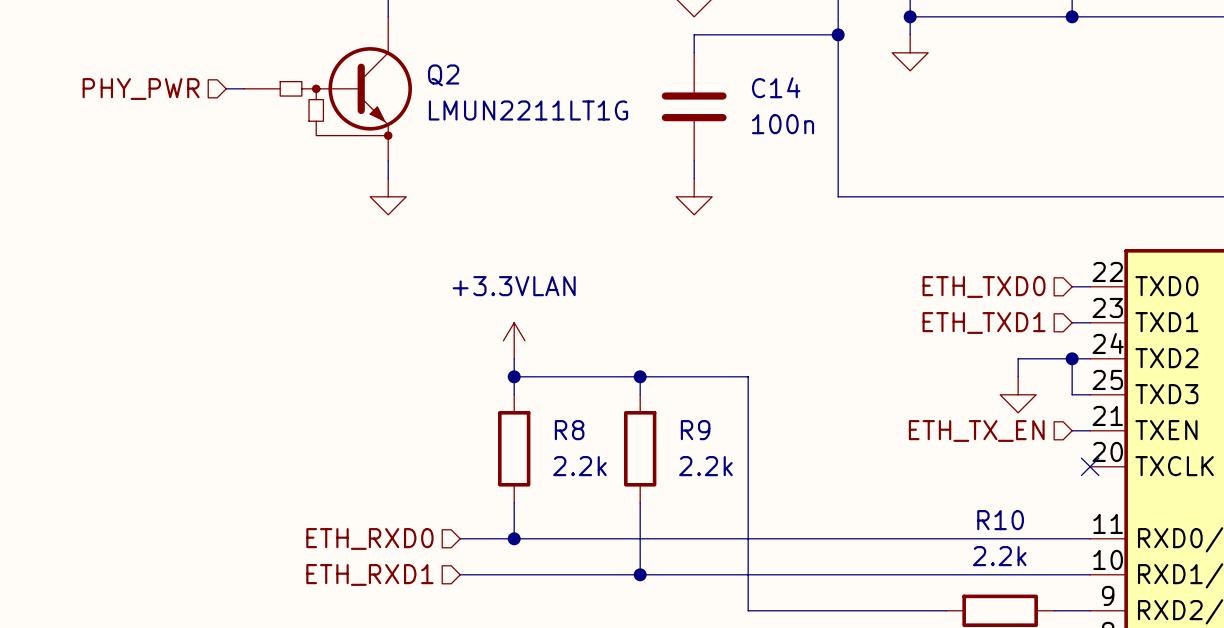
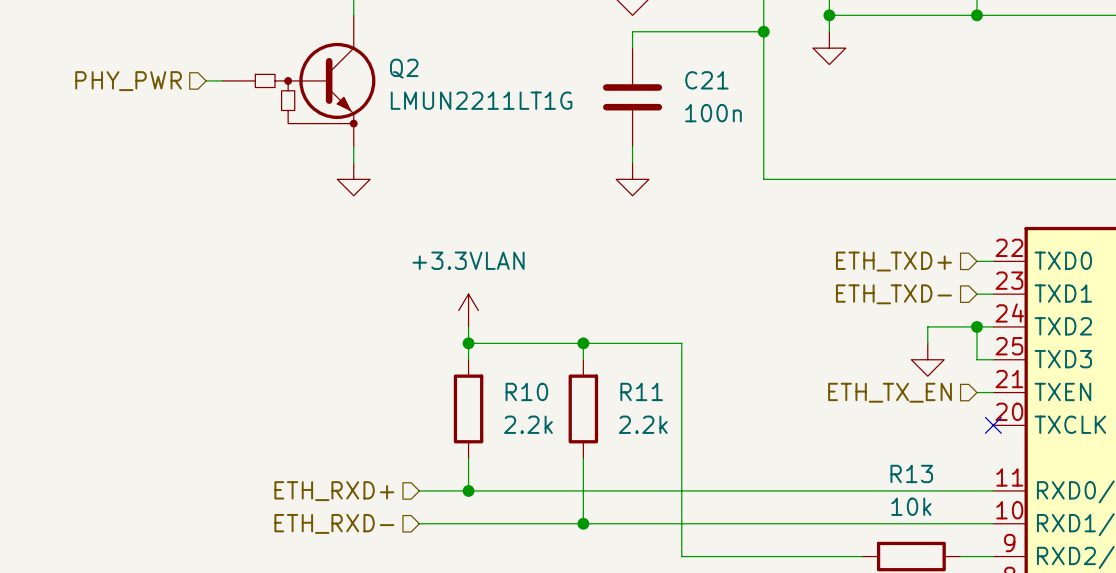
C14 name: C14 (776, 87) -> C21 (706, 80)
hierarchical label: ETH_TXD0 (984, 287) -> ETH_TXD+ (893, 261)
hierarchical label: ETH_TXD1 (984, 322) -> ETH_TXD- (893, 294)
R8 name: R8 (569, 430) -> R10 (526, 391)
R9 name: R9 (695, 430) -> R11 (641, 391)
R10 name: R10 (1000, 520) -> R13 (911, 473)
hierarchical label: ETH_RXD0 (369, 538) -> ETH_RXD+ (334, 491)
R10 value: 2.2k (999, 556) -> 10k (911, 506)
hierarchical label: ETH_RXD1 (369, 574) -> ETH_RXD- (334, 523)

